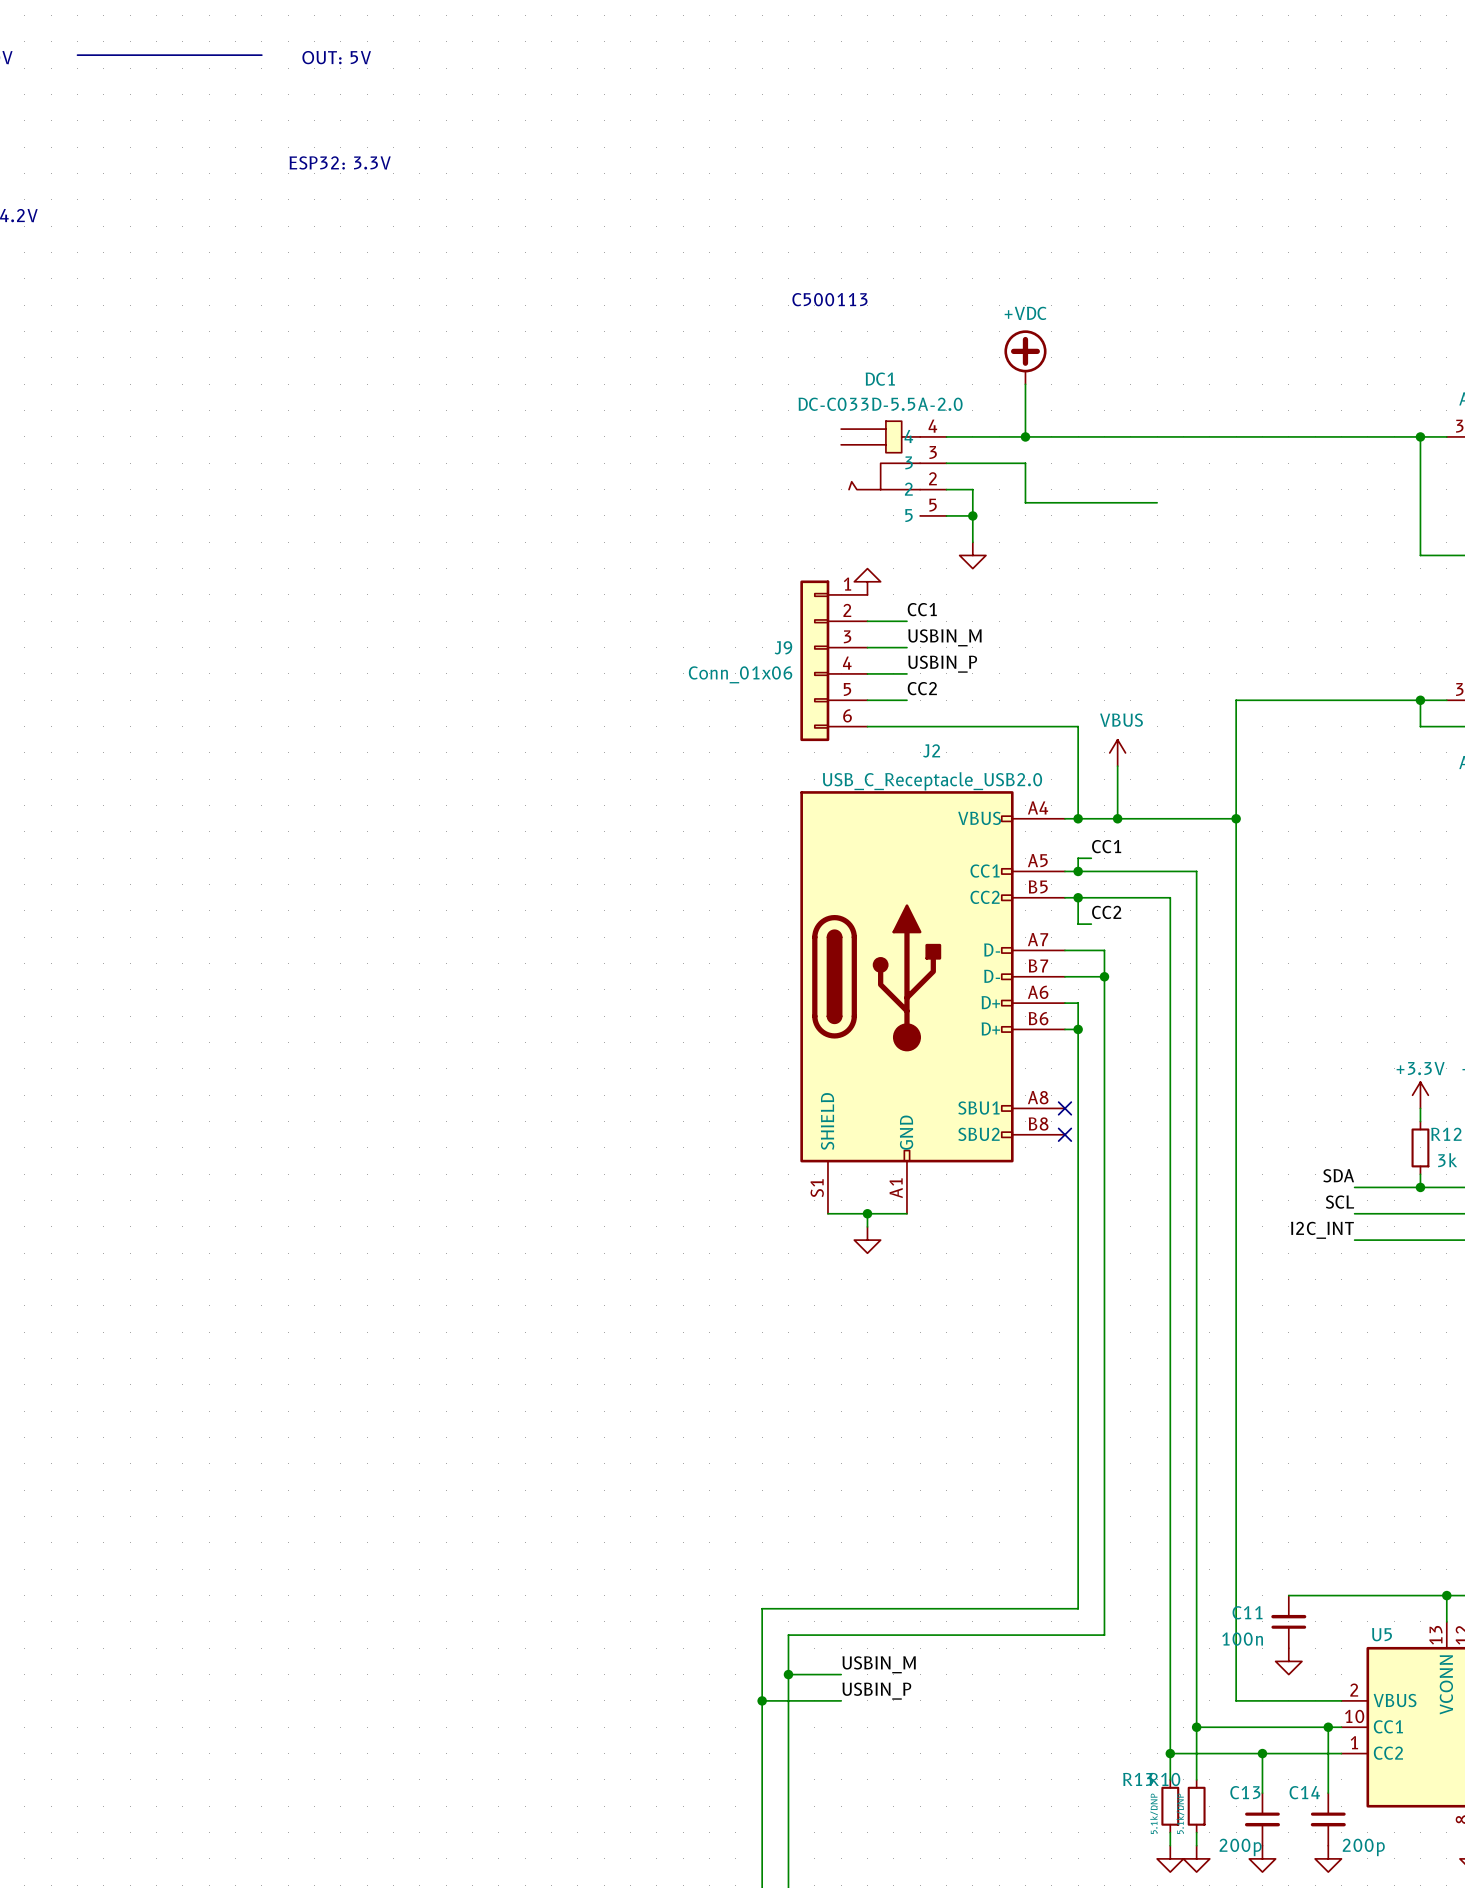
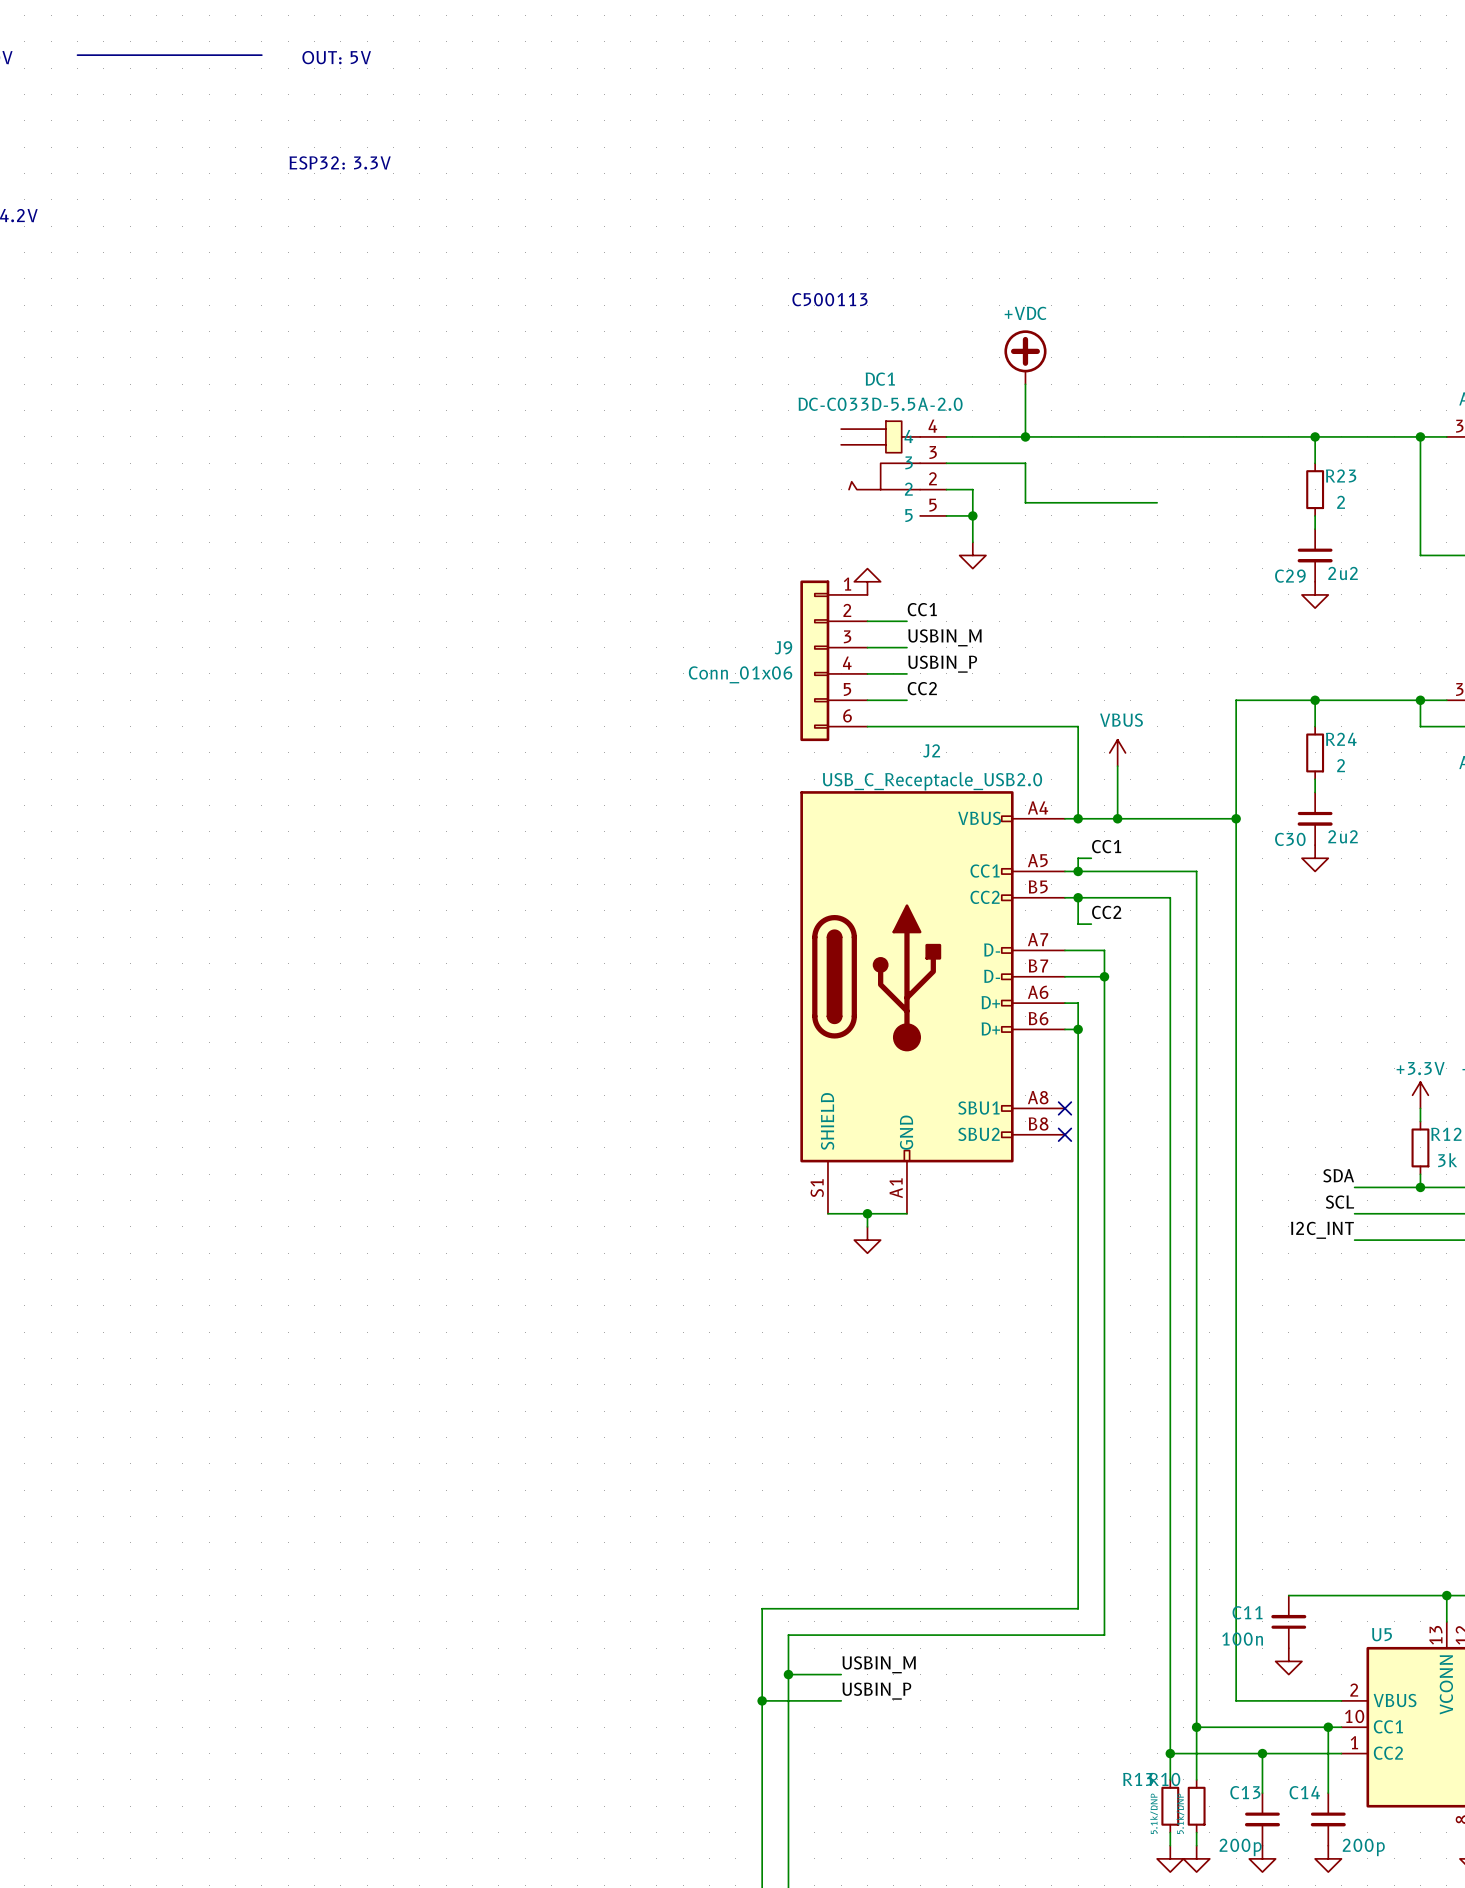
wire: none -> (1315, 436) (1315, 463)
junction: none -> (1315, 436)
R23: none -> 2 (1315, 489)
wire: none -> (1315, 515) (1315, 529)
C29: none -> 2u2 (1315, 555)
power symbol: none -> (1315, 594)
wire: none -> (1315, 700) (1315, 726)
junction: none -> (1315, 700)
R24: none -> 2 (1315, 752)
wire: none -> (1315, 779) (1315, 792)
C30: none -> 2u2 (1315, 818)
power symbol: none -> (1315, 858)

